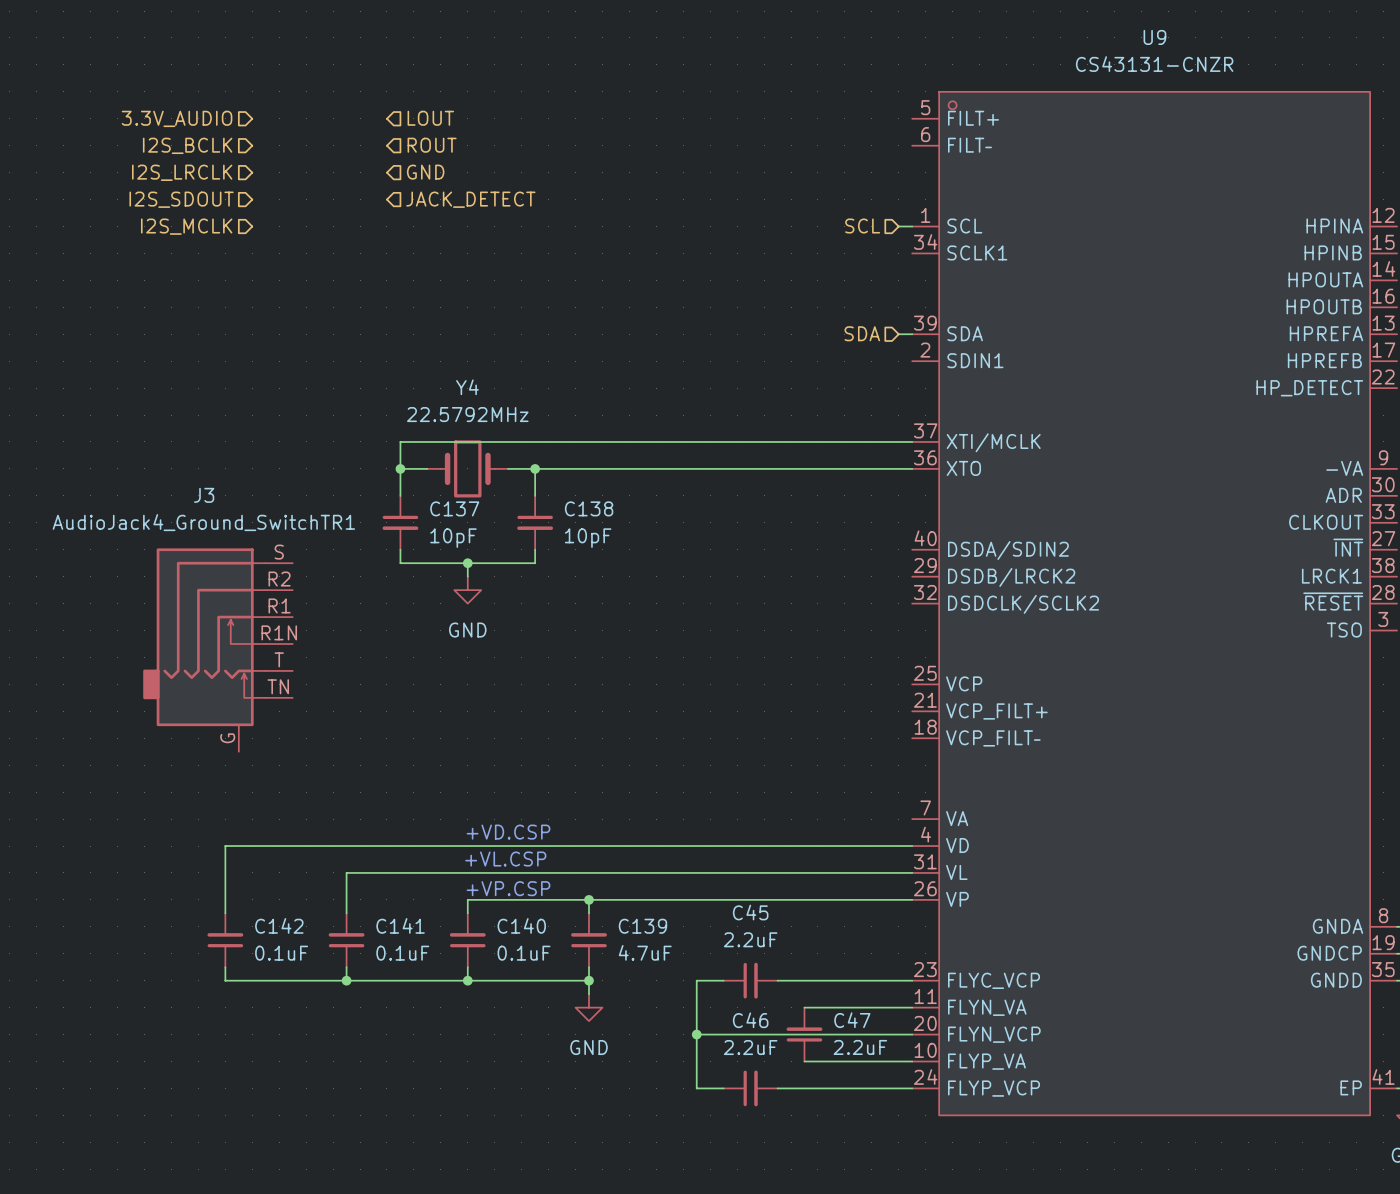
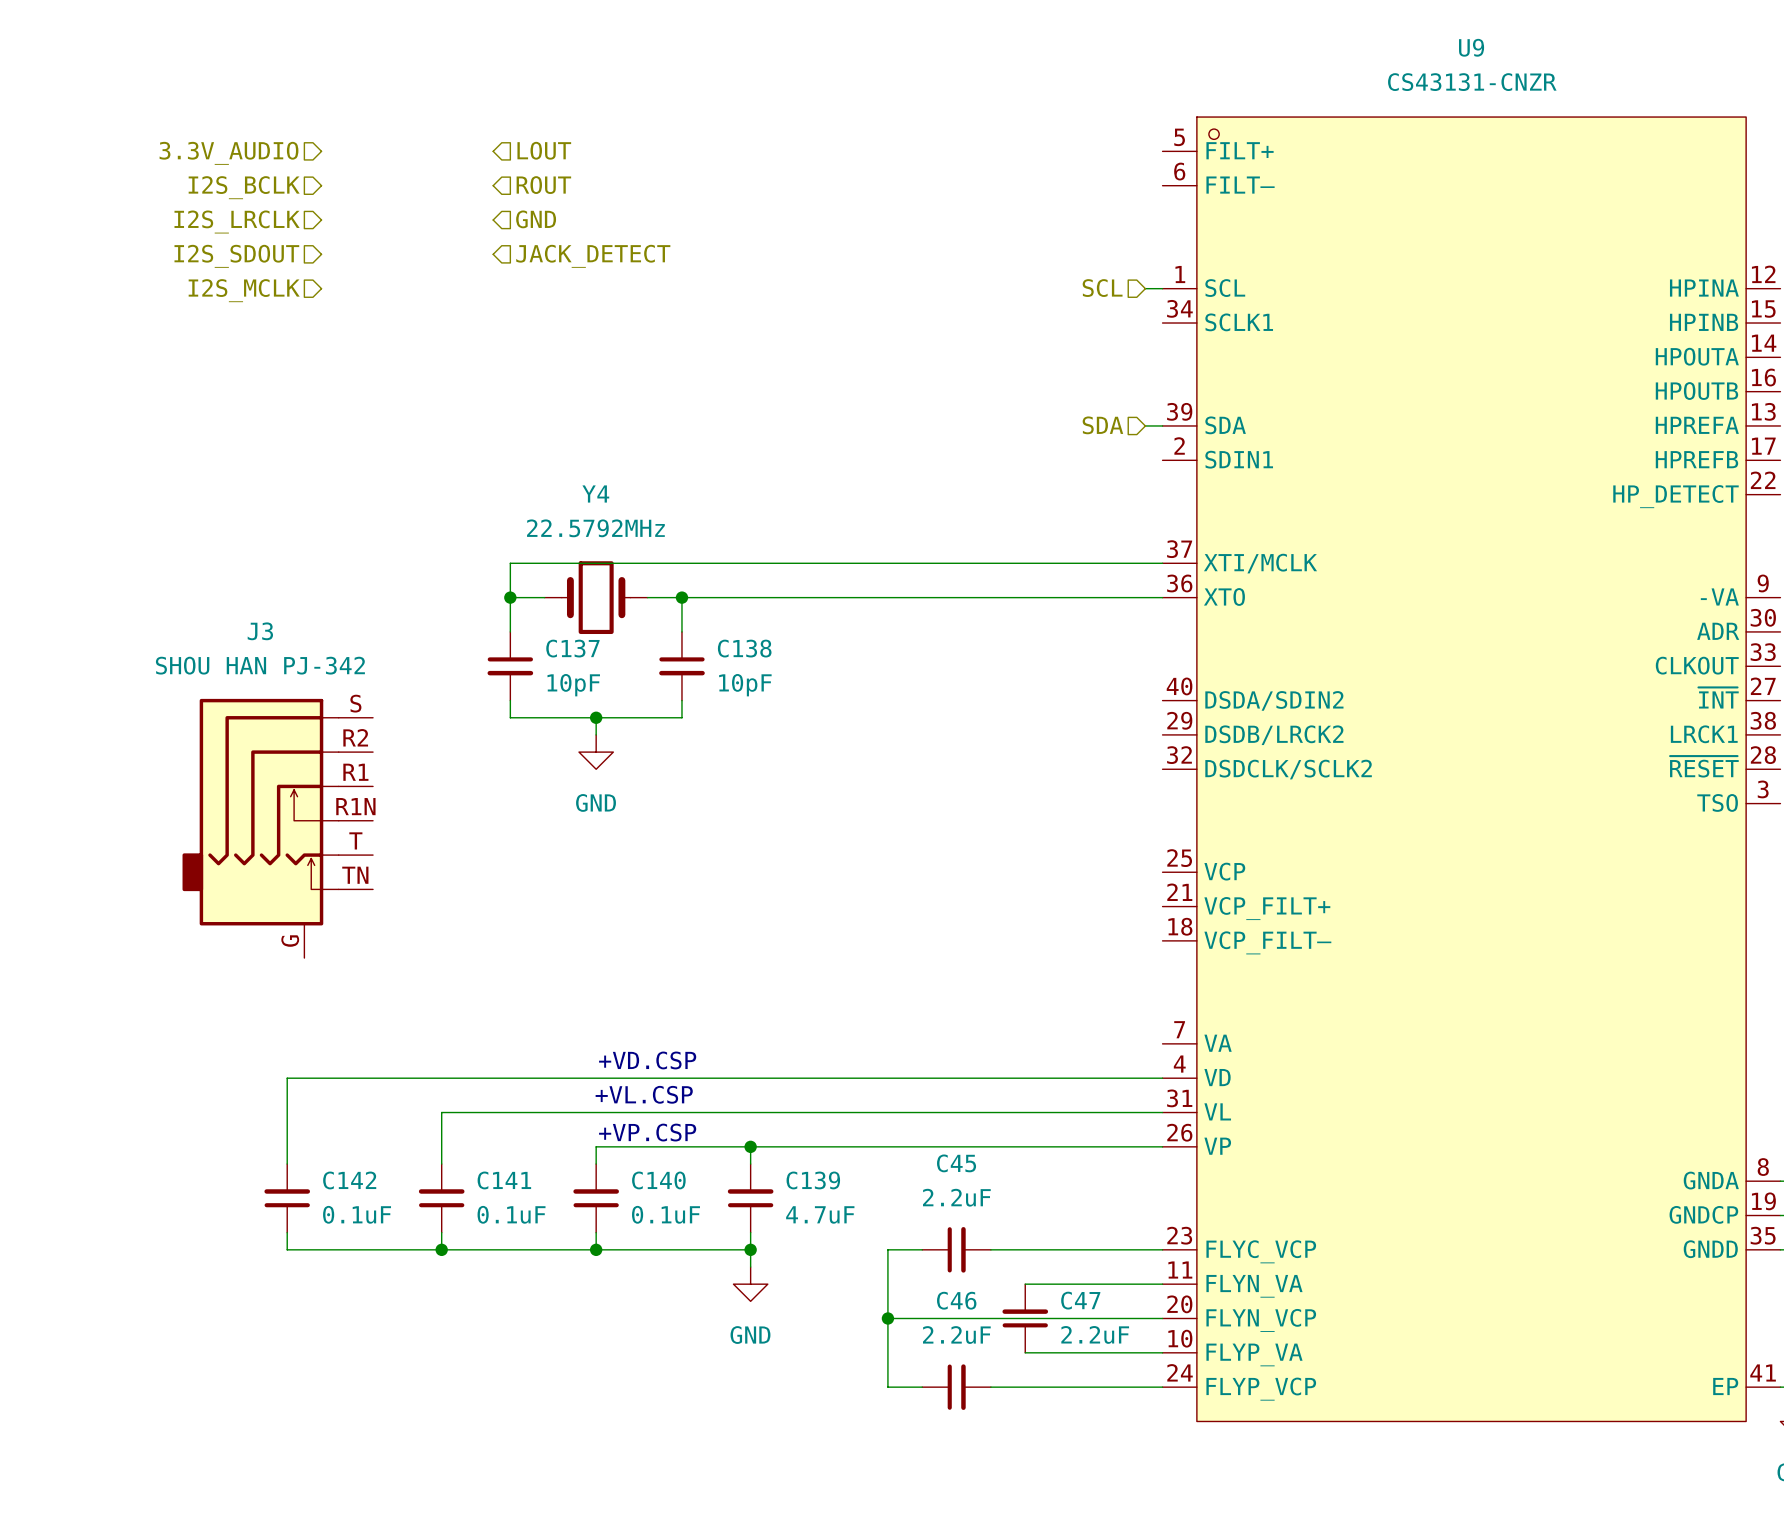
J3 value: AudioJack4_Ground_SwitchTR1 (203, 522) -> SHOU HAN PJ-342 (260, 665)

